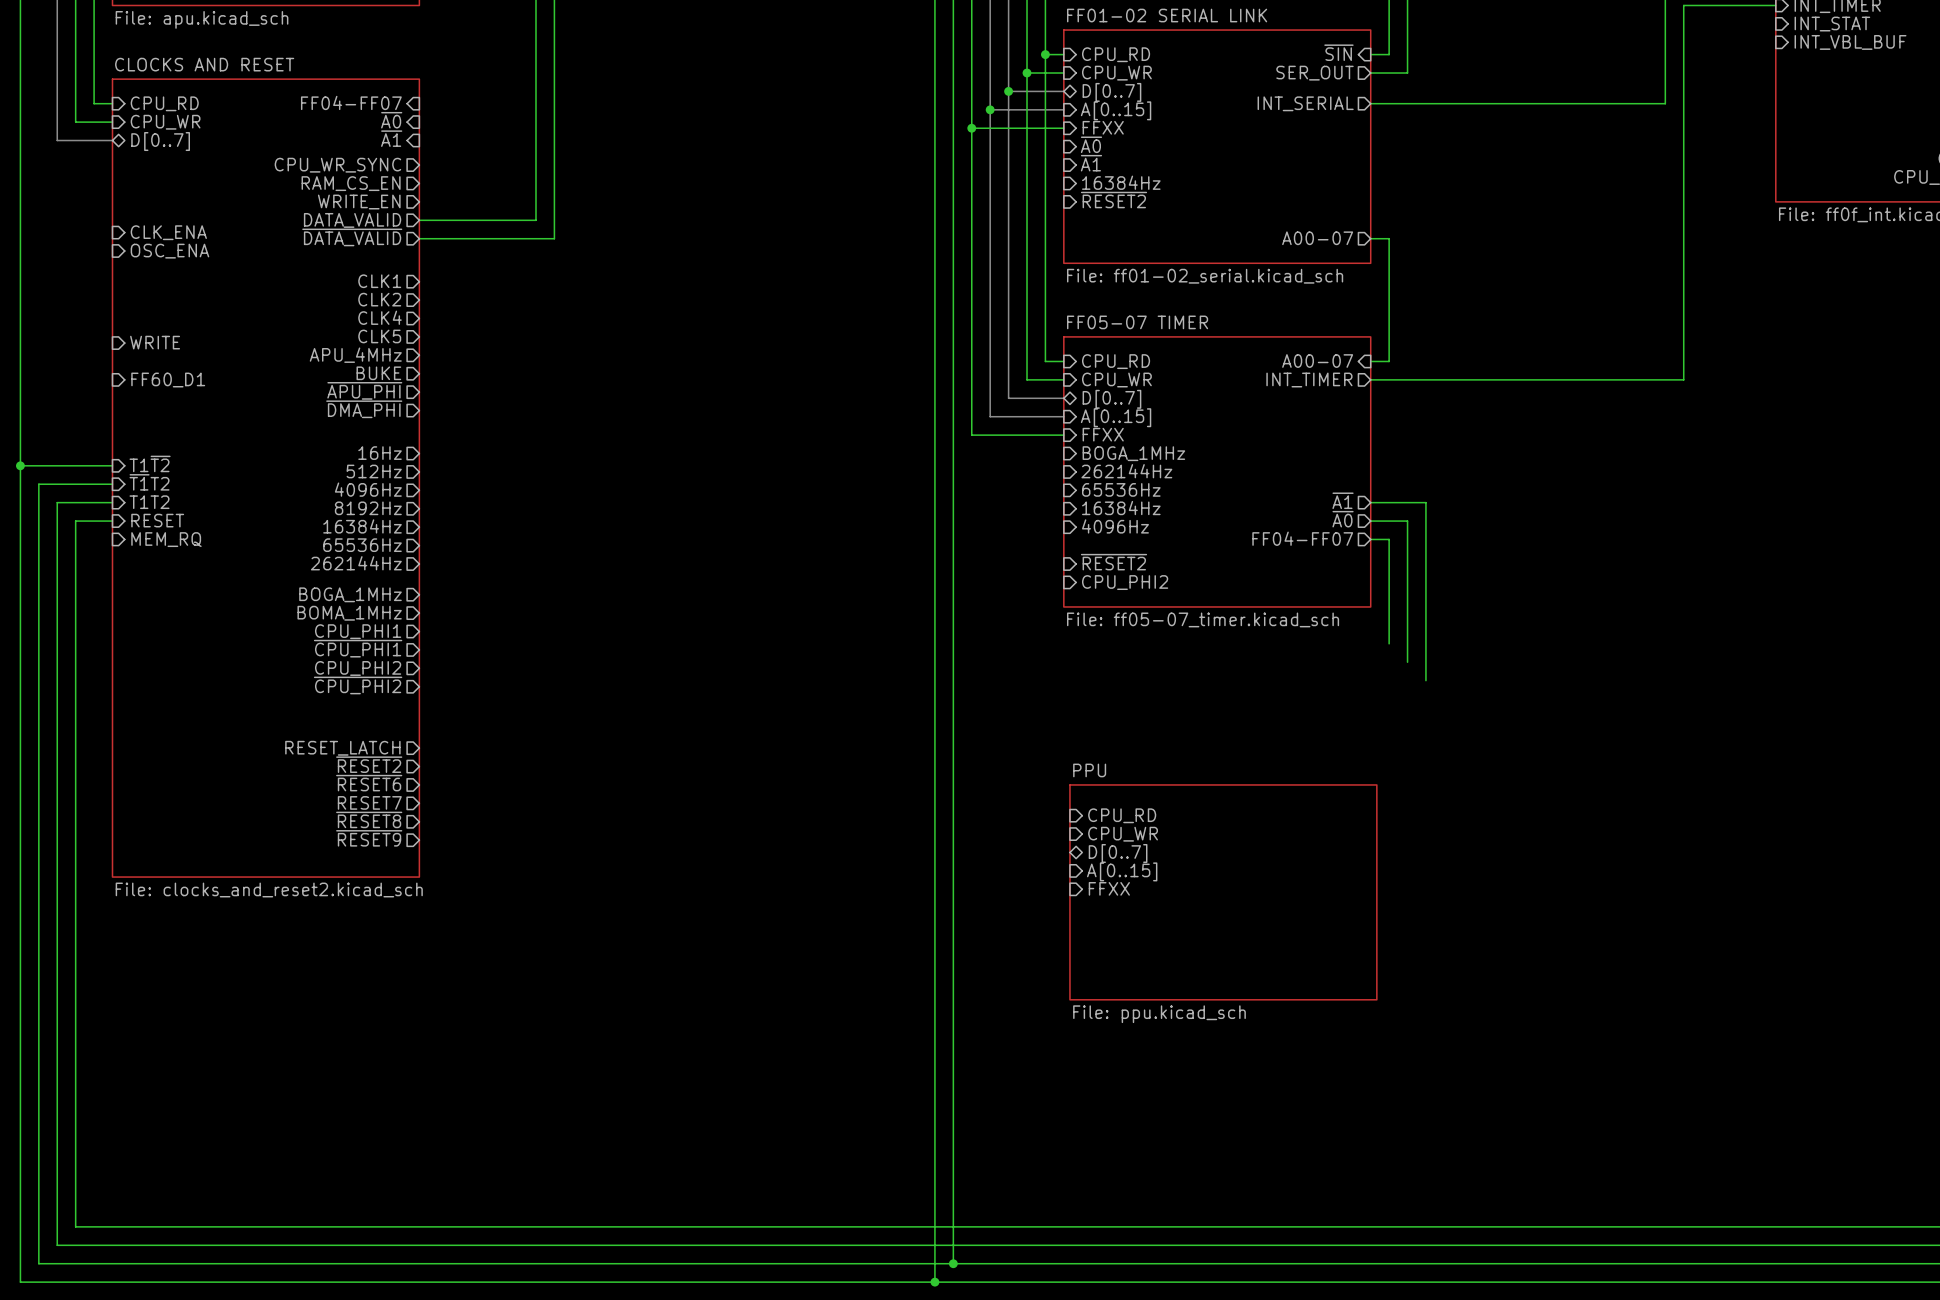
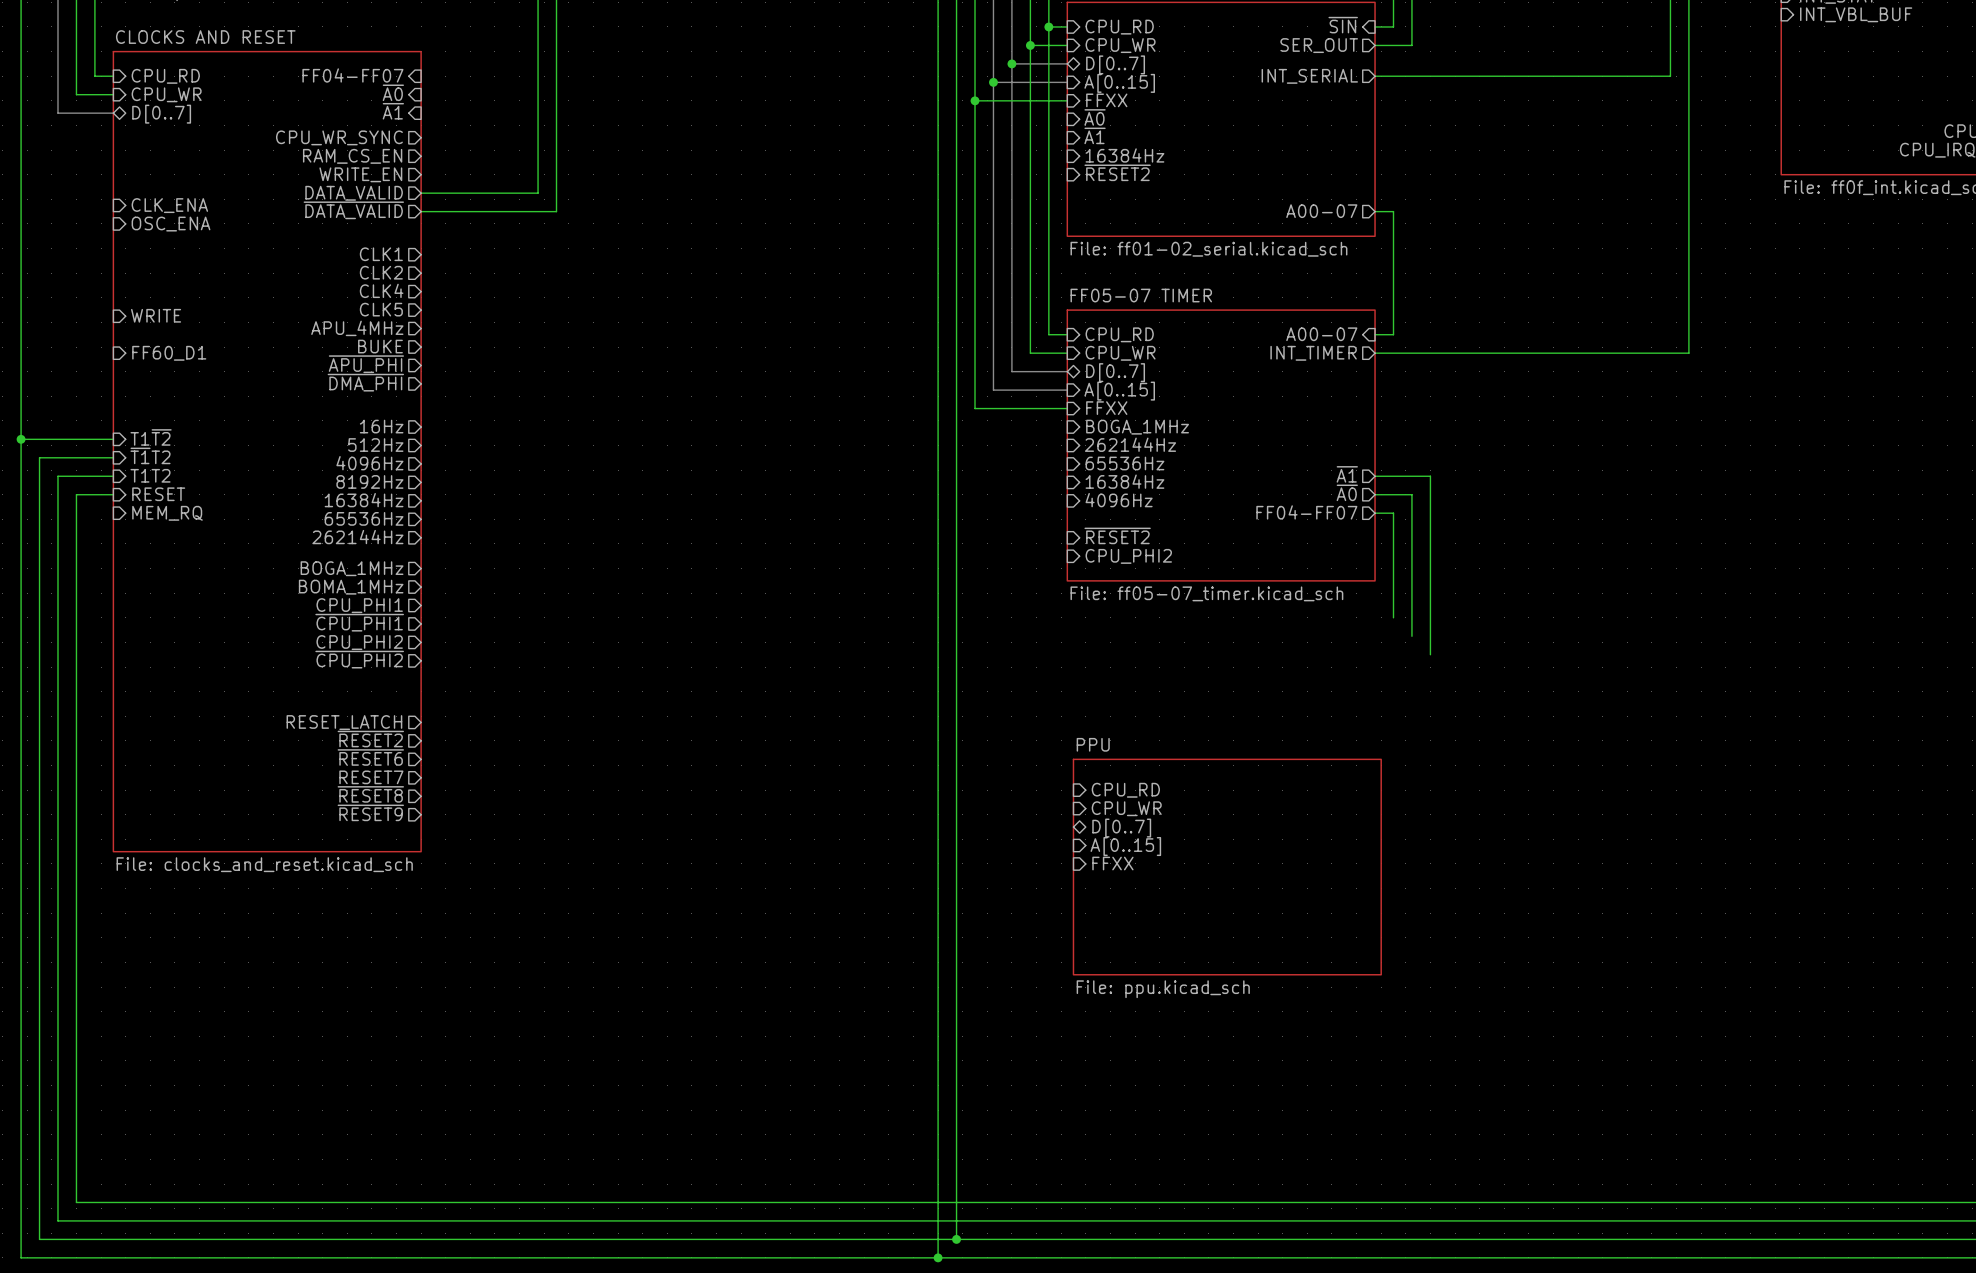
sheet CLOCKS AND RESET value: File: clocks_and_reset2.kicad_sch (269, 890) -> File: clocks_and_reset.kicad_sch (264, 864)

